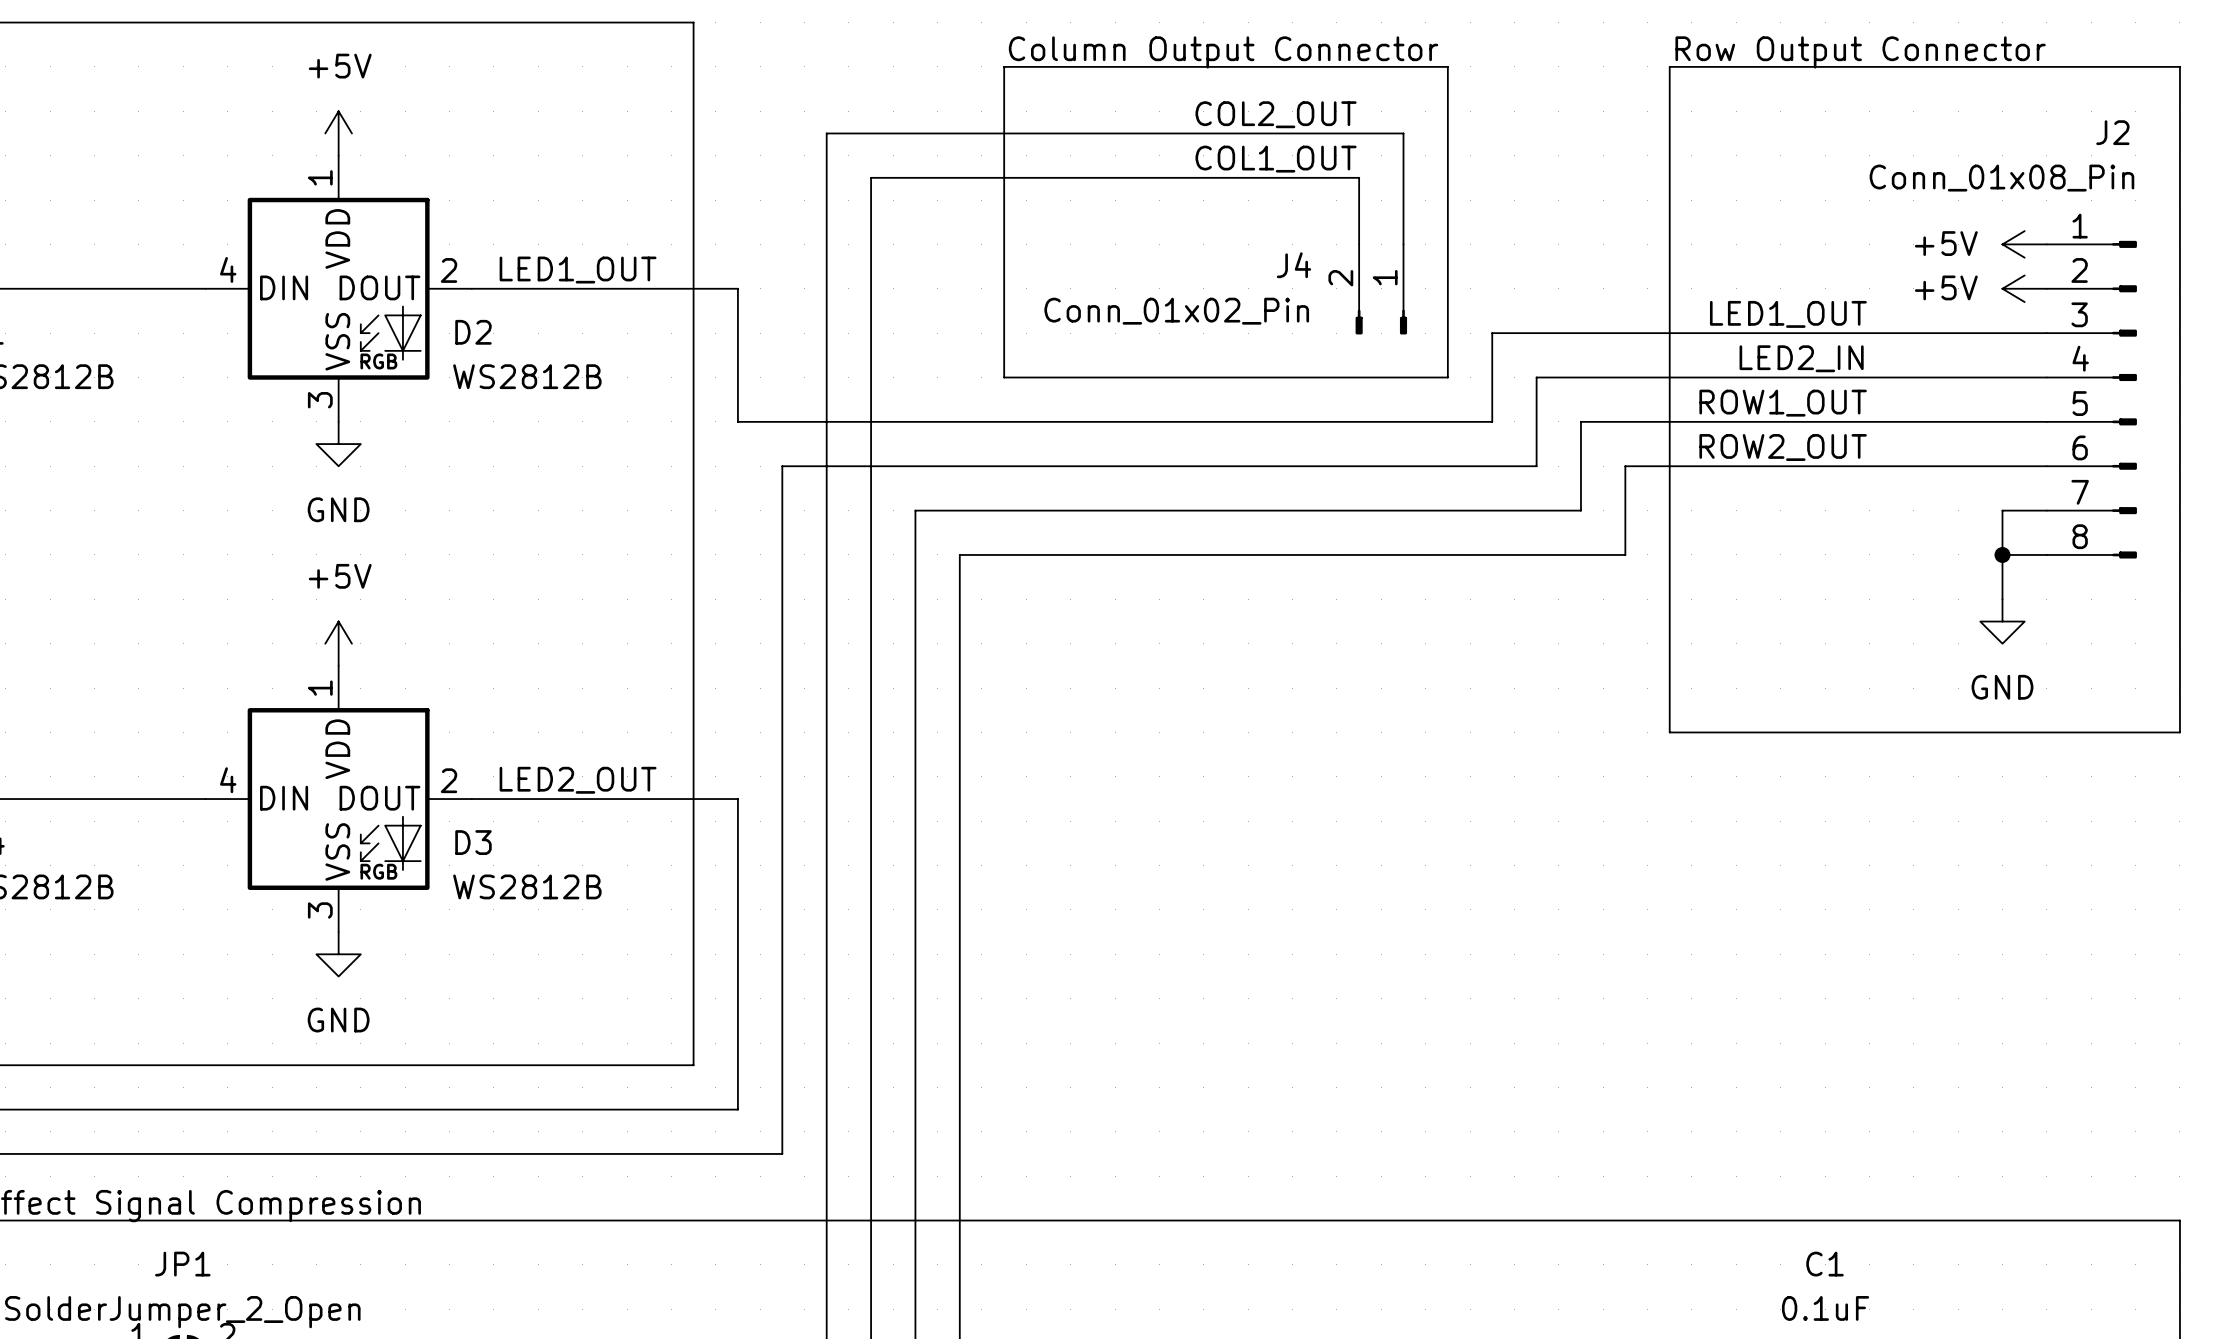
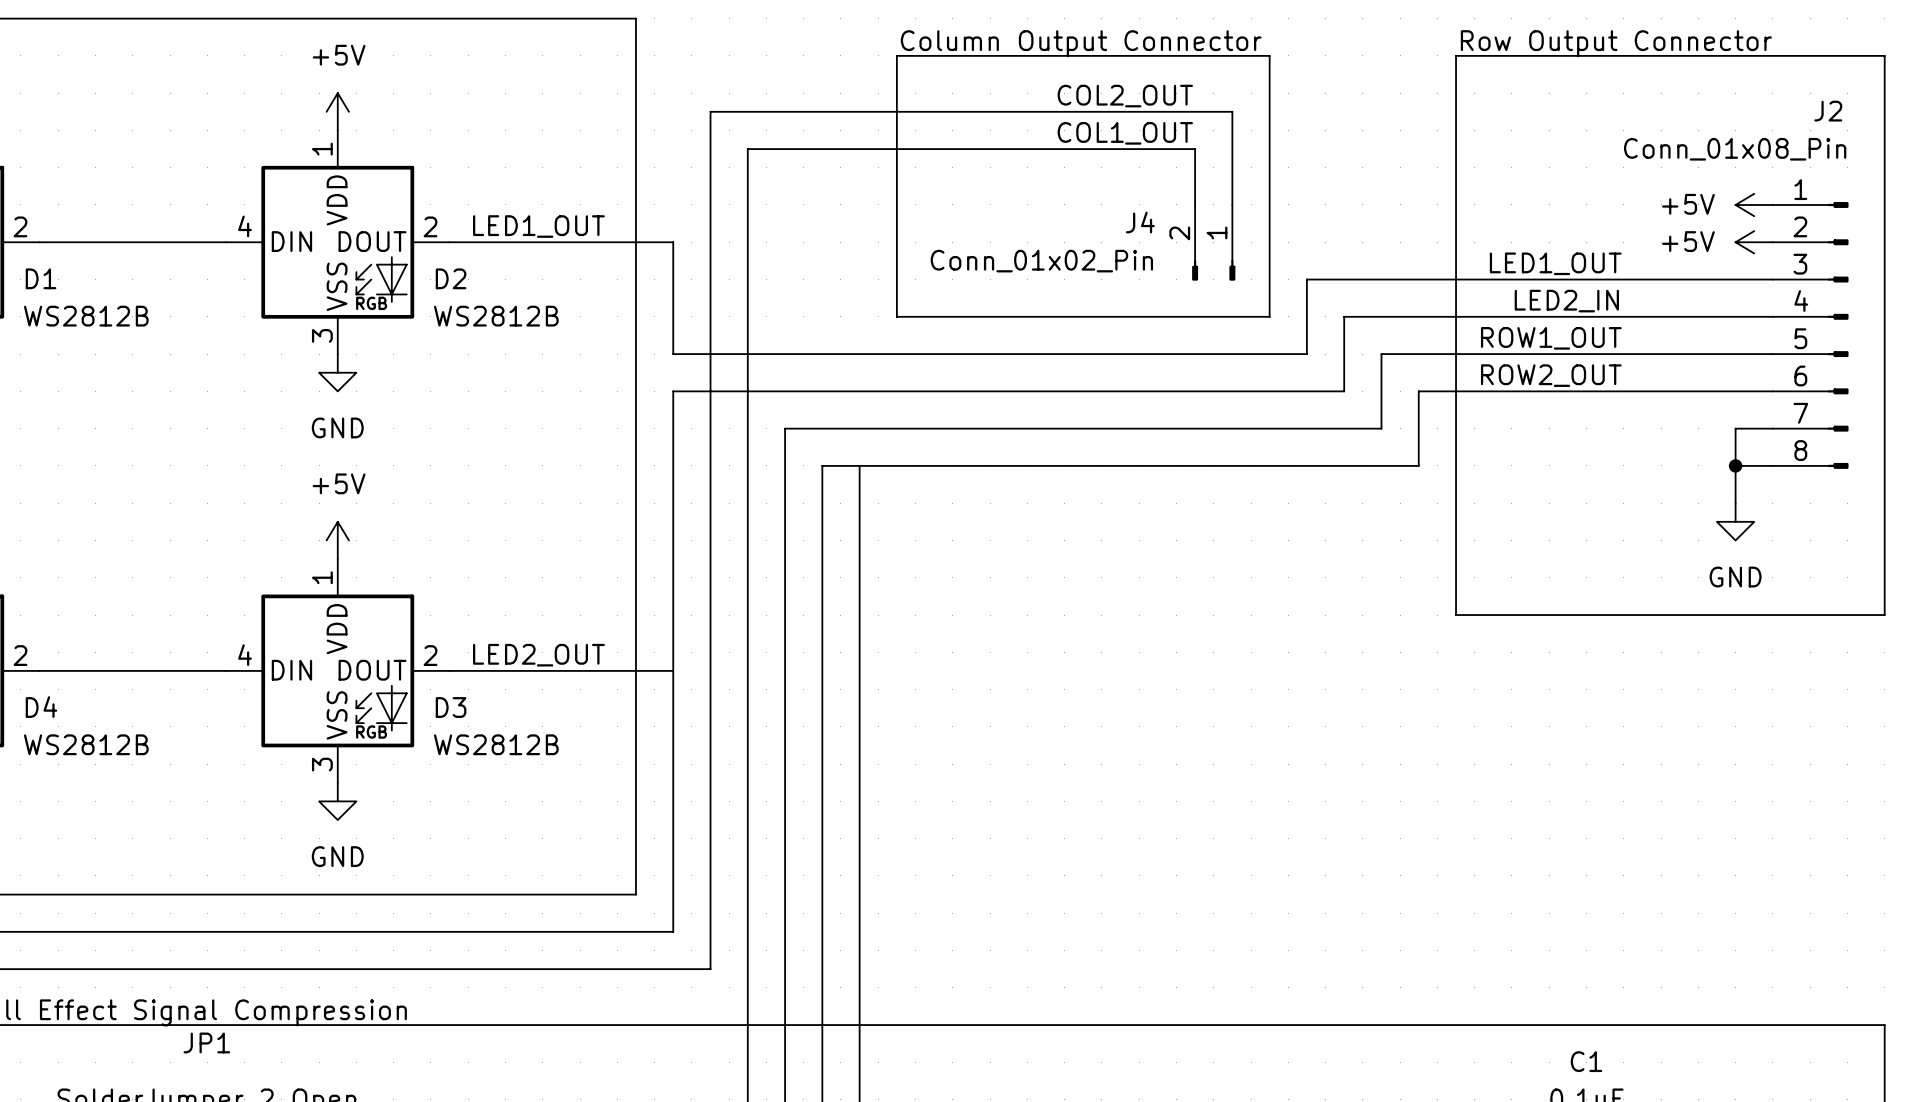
wire: (826, 133) (826, 177) -> (785, 149) (747, 149)
wire: none -> (747, 111) (710, 111) (710, 391) (673, 391) (673, 670)
wire: (871, 177) (871, 510) -> (822, 428) (785, 428)
wire: (915, 510) (915, 554) -> (859, 465) (822, 465)
JP1 name position: JP1 (182, 1264) -> JP1 (206, 1042)

